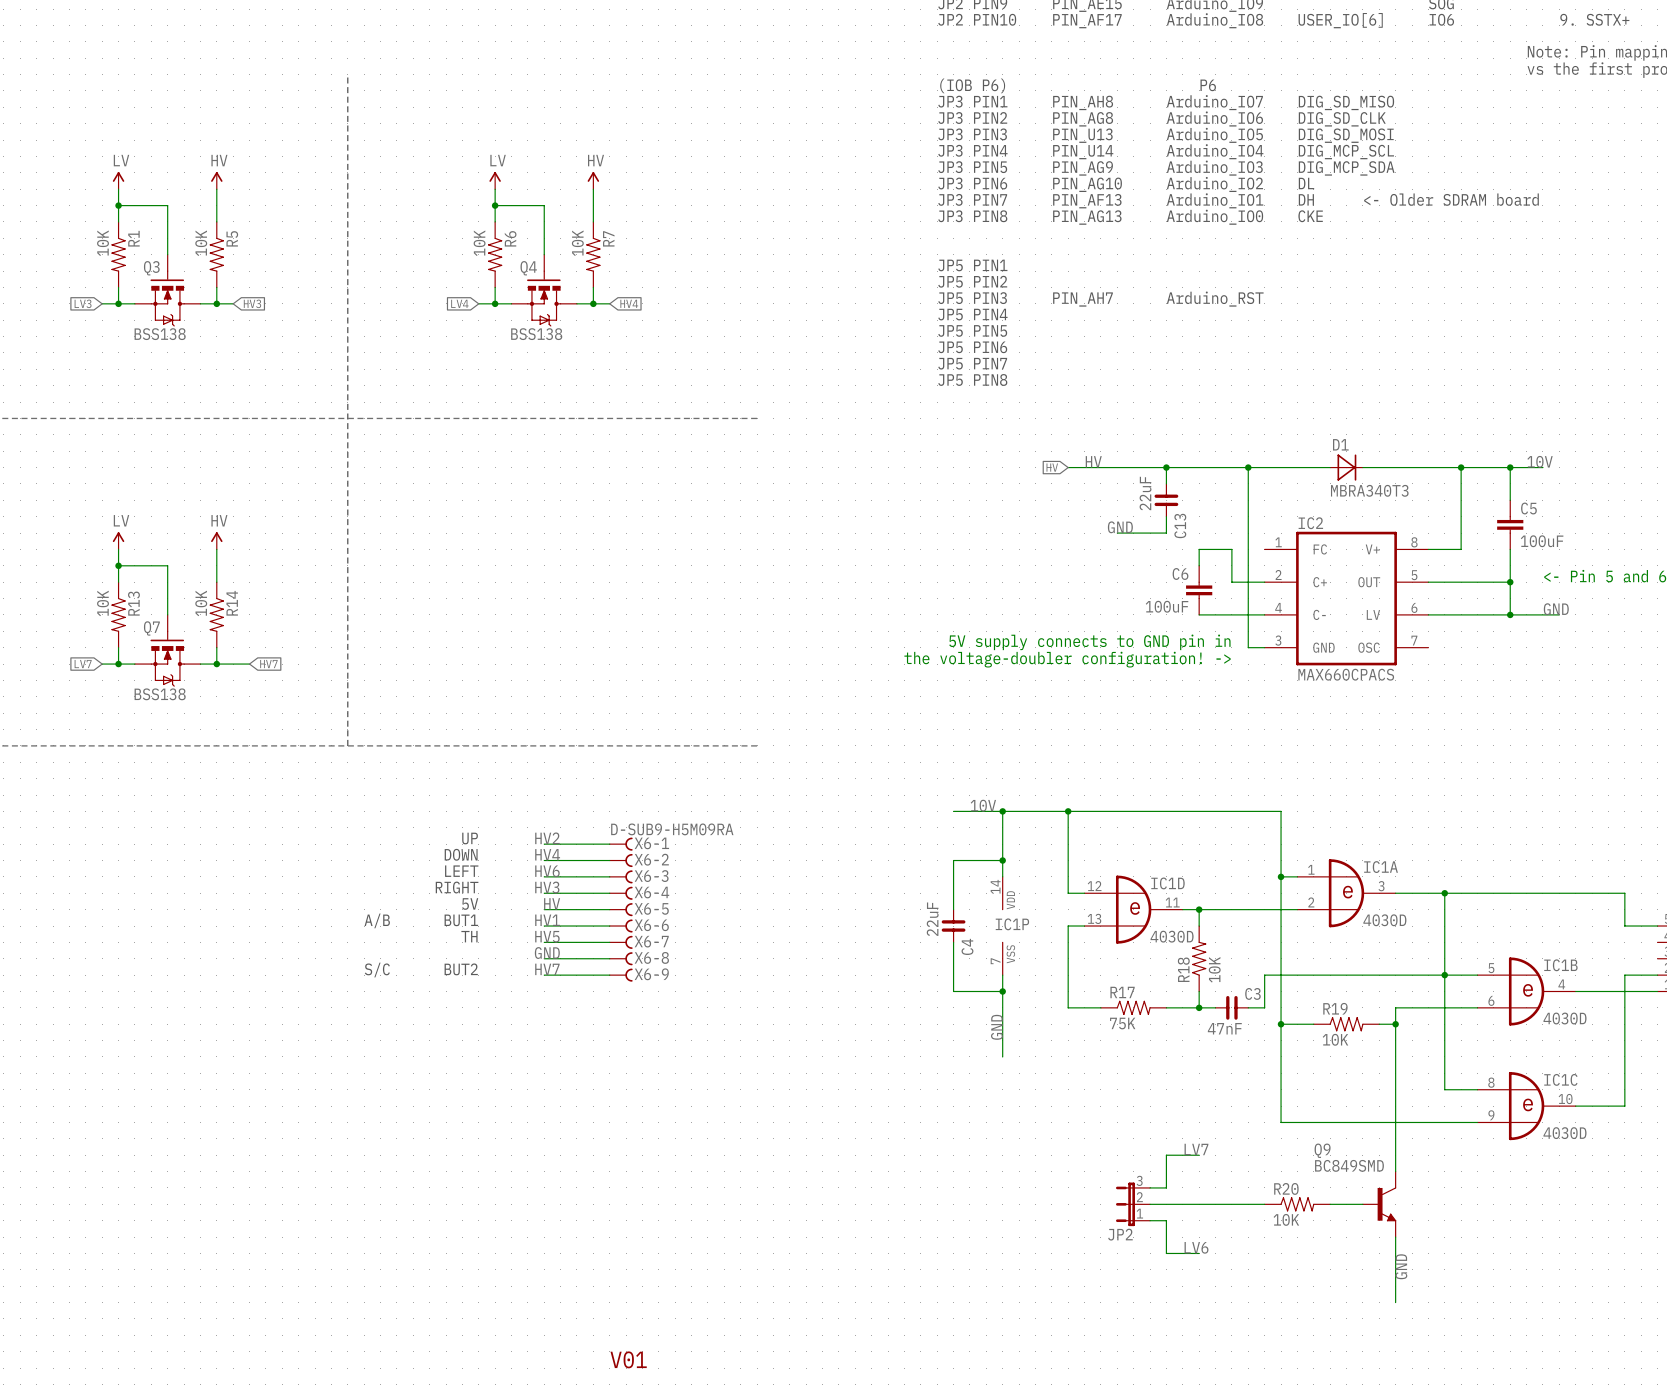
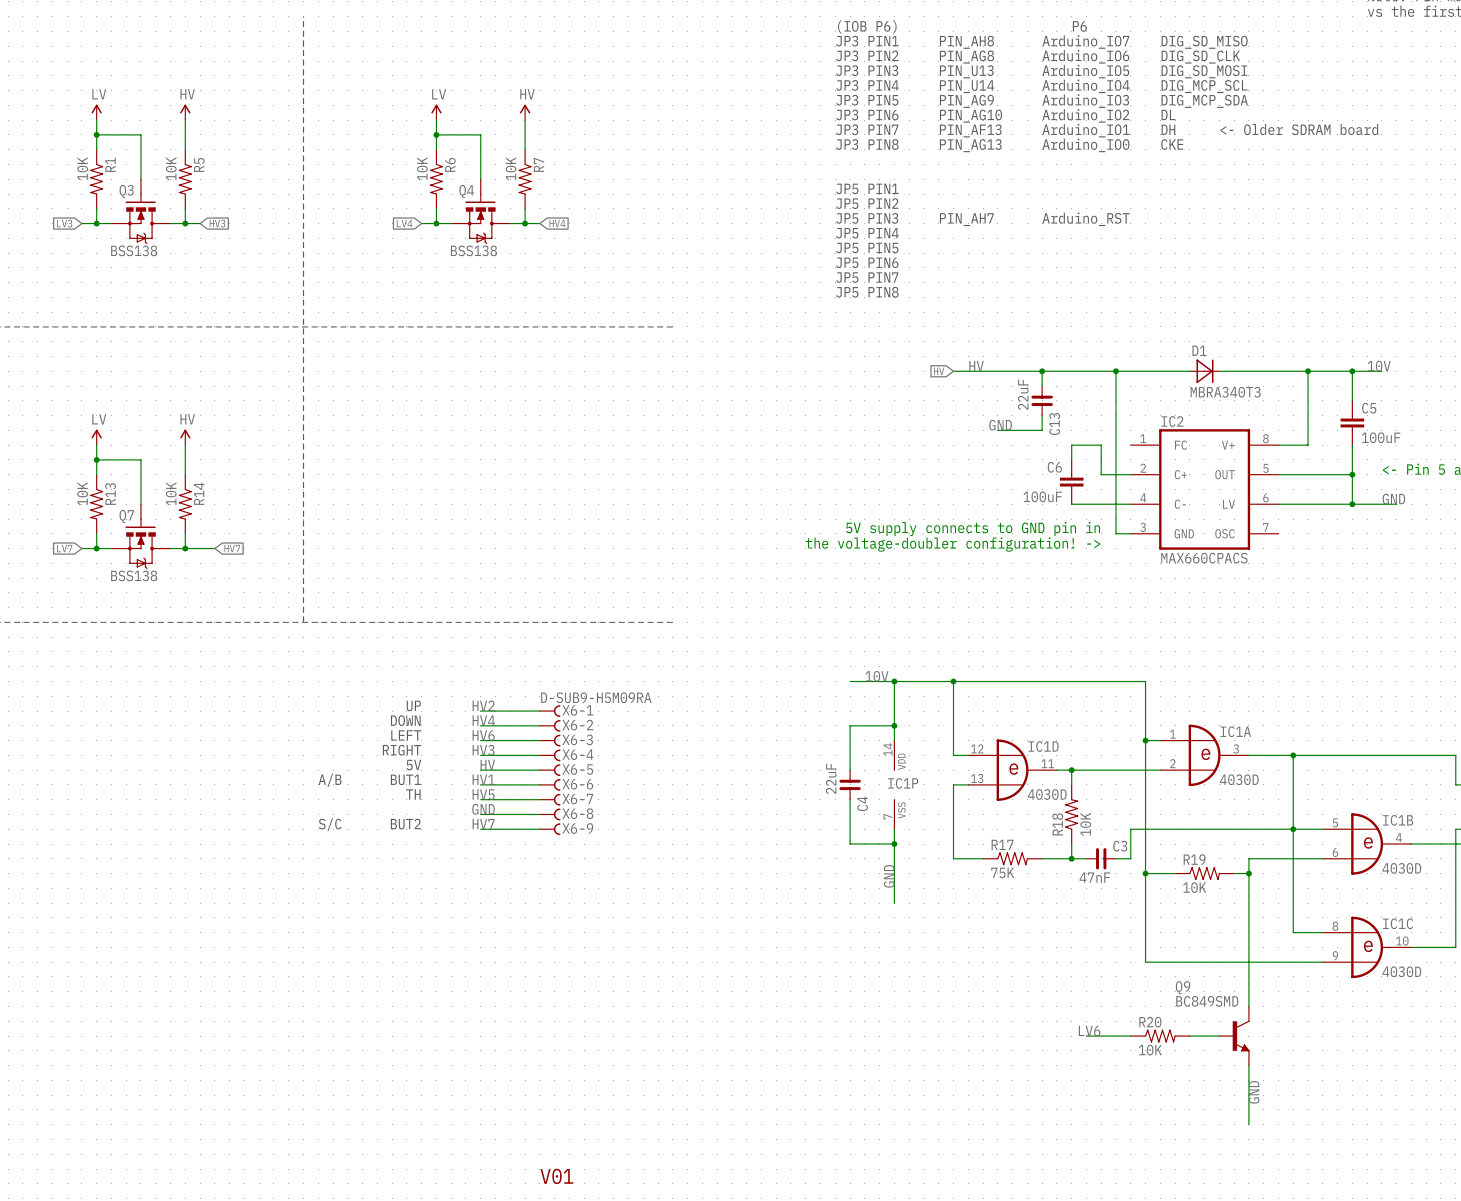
label: LV7 (1196, 1149) -> none
wire: (1199, 1155) (1166, 1155) (1166, 1187) (1150, 1187) -> none
JP2: (1133, 1204) -> none
wire: (1150, 1204) (1215, 1204) -> none
wire: (1150, 1220) (1166, 1220) (1166, 1253) (1199, 1253) -> none
label position: LV6 (1196, 1247) -> LV6 (1089, 1030)

